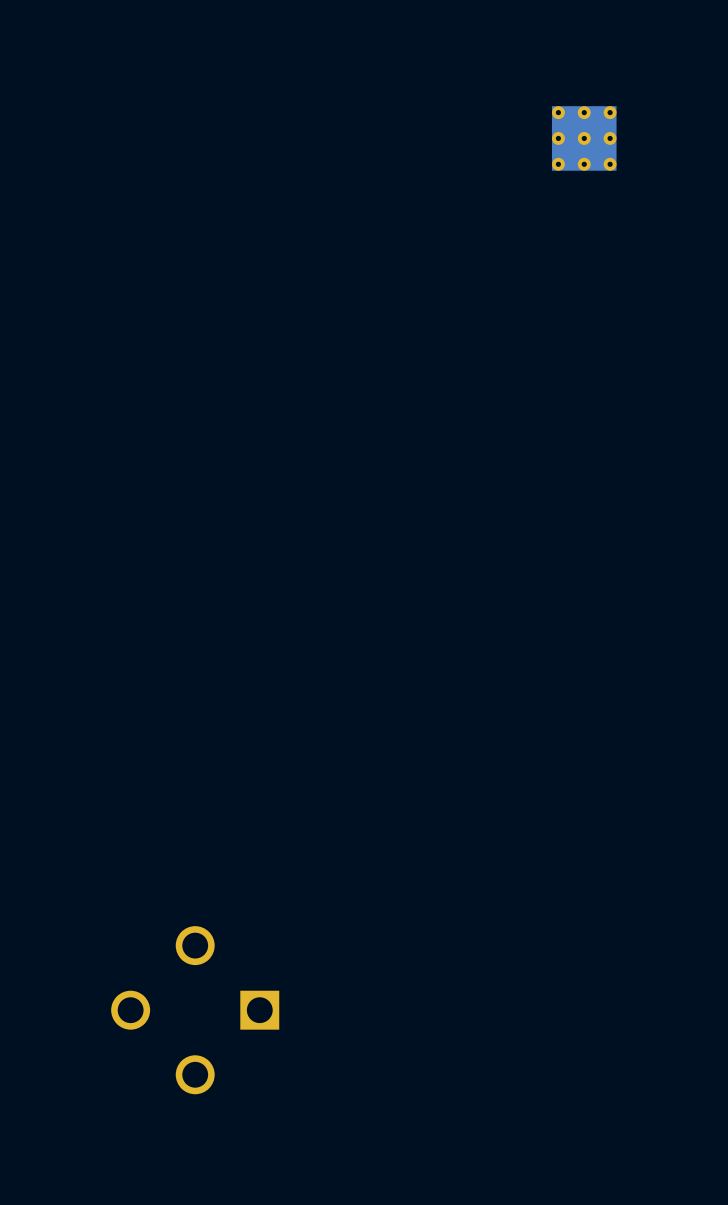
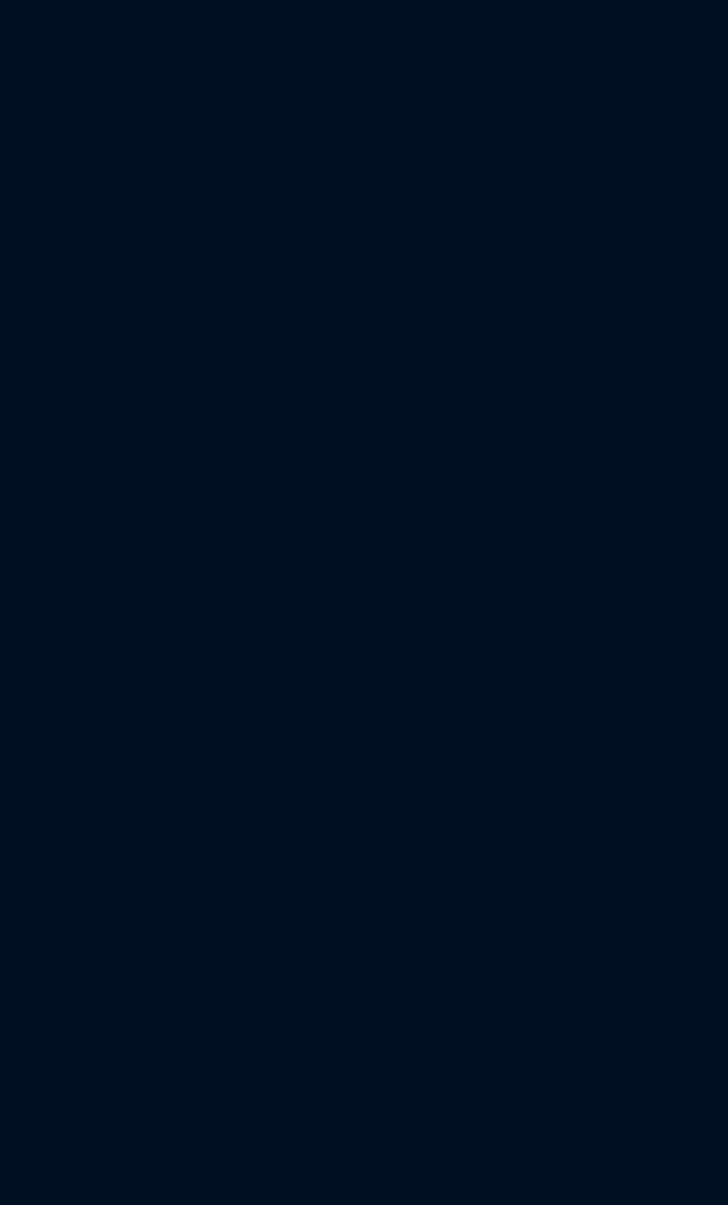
part: (584, 138) -> none
part: (195, 1010) -> none

